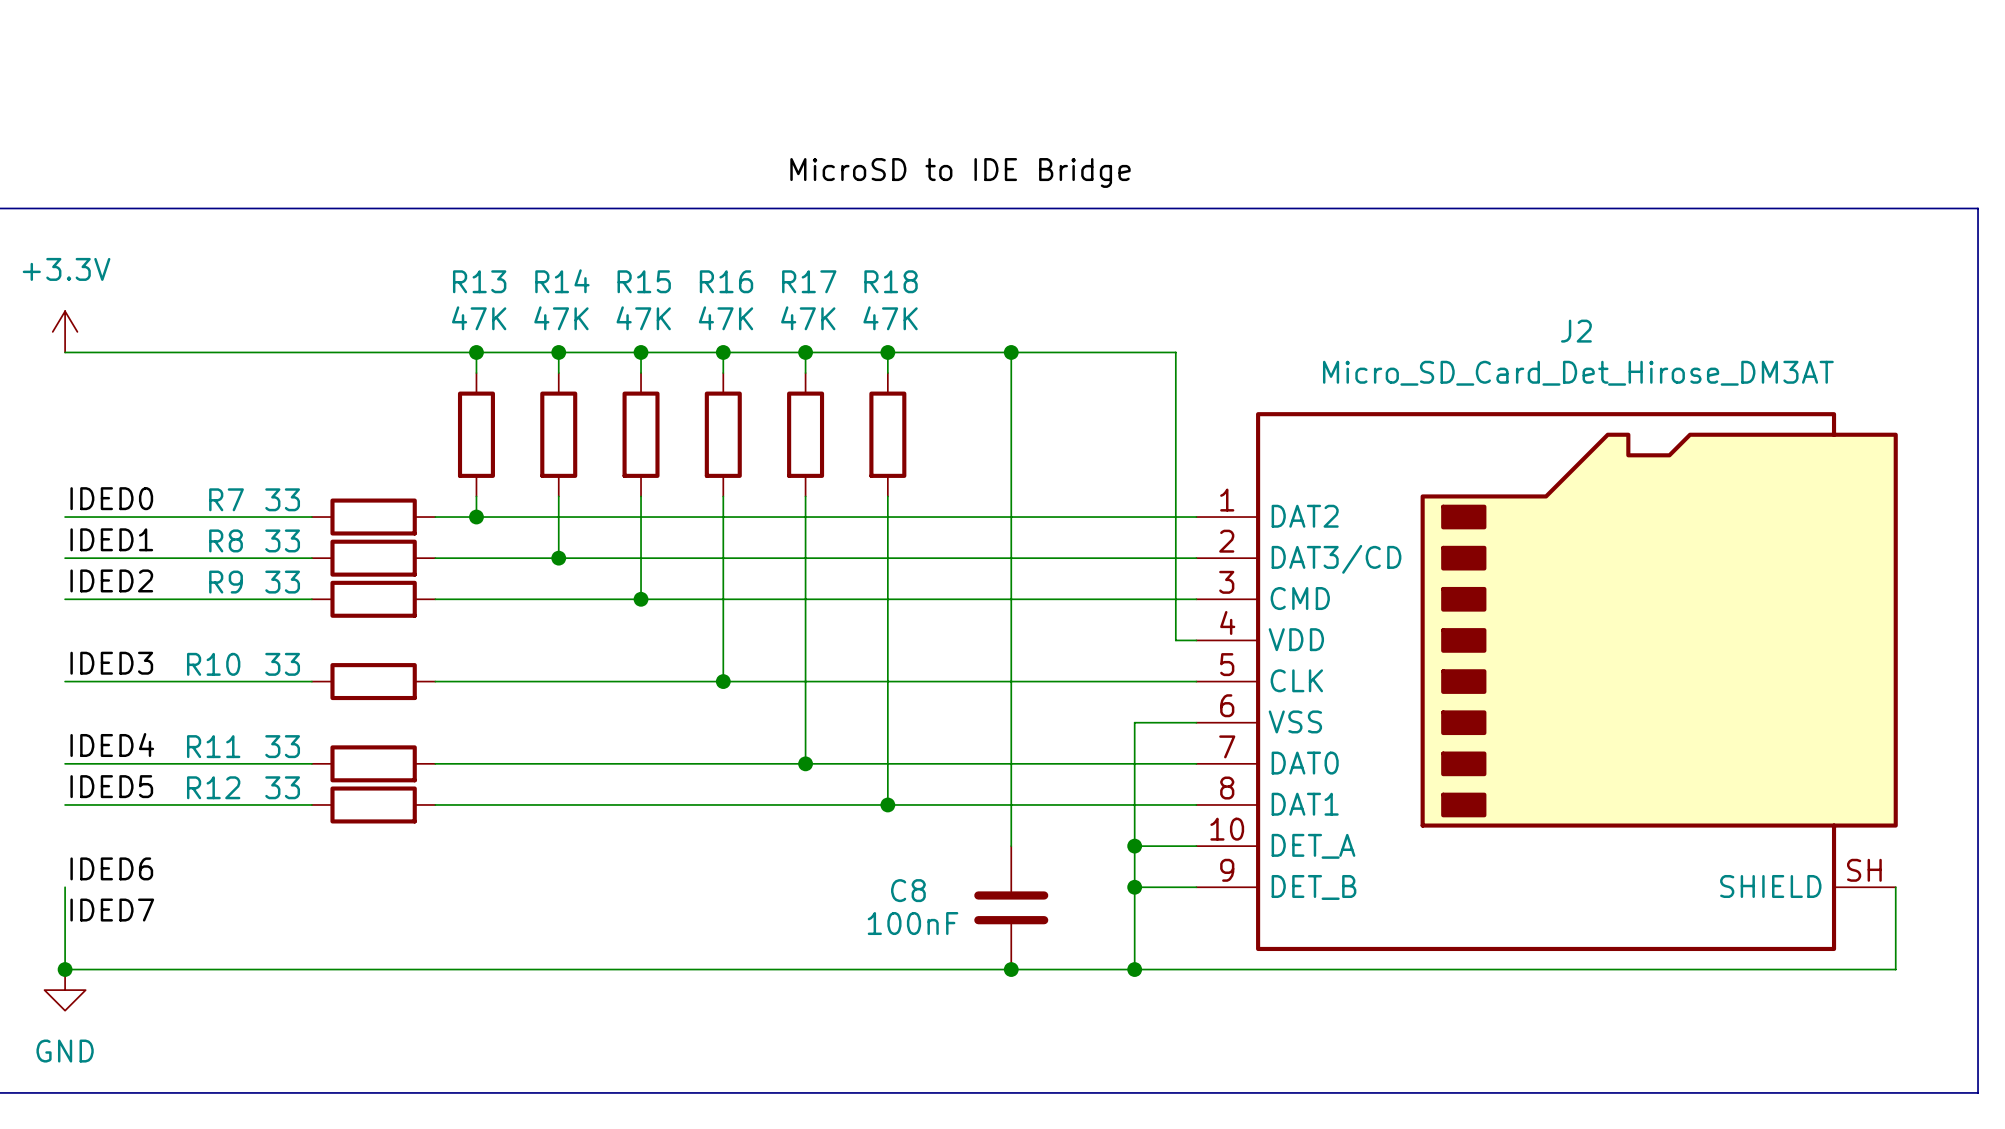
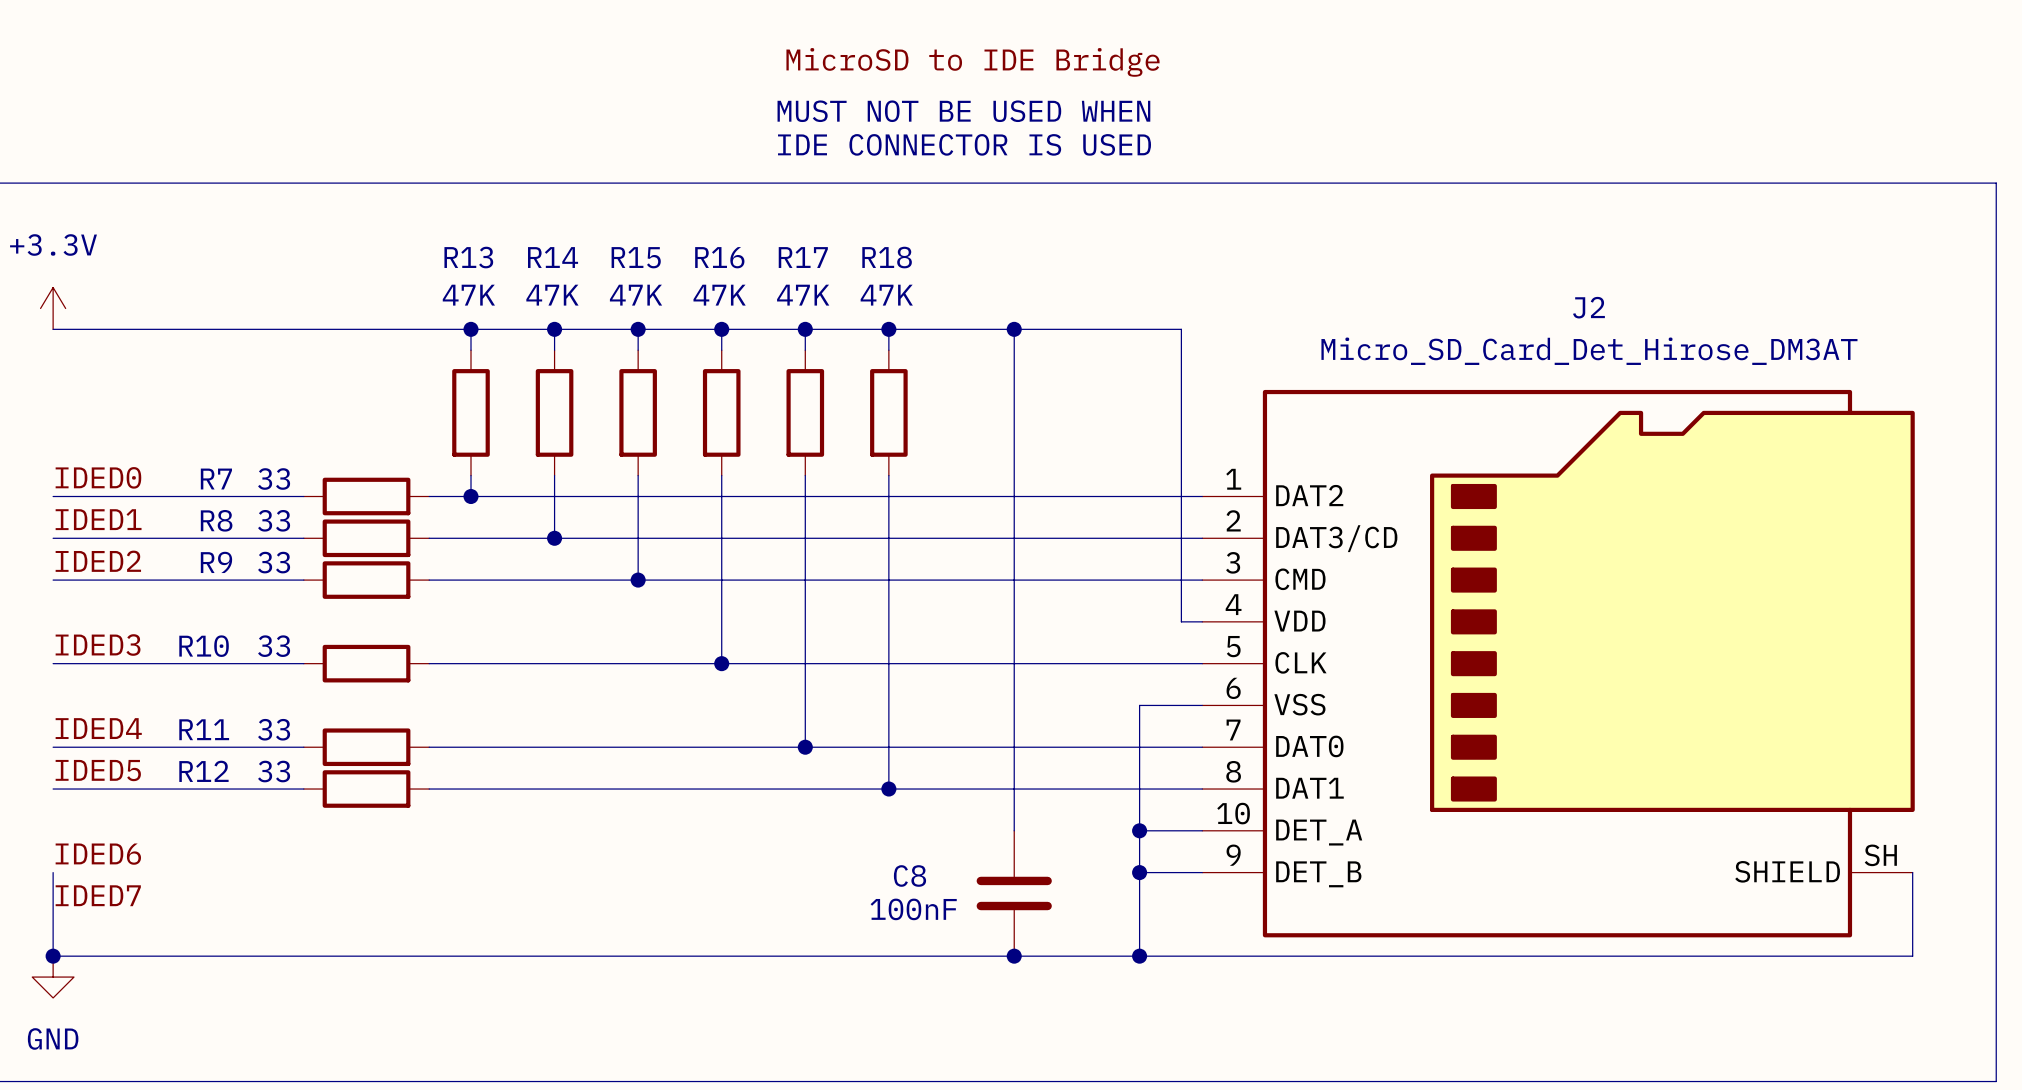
text: none -> MUST NOT BE USED WHEN (963, 111)
text: none -> IDE CONNECTOR IS USED (964, 144)
label position: MicroSD to IDE Bridge (960, 172) -> MicroSD to IDE Bridge (973, 62)

